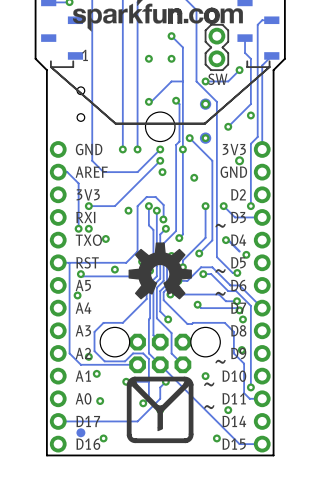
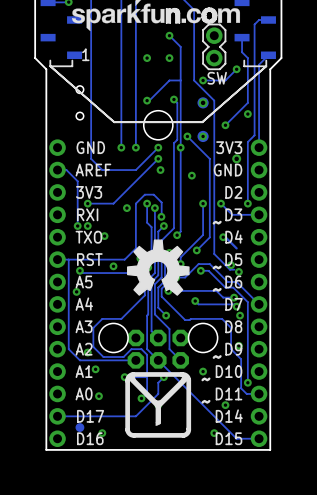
via: (246, 254) -> none
via: none -> (231, 265)
via: (237, 272) -> none
via: none -> (238, 271)

